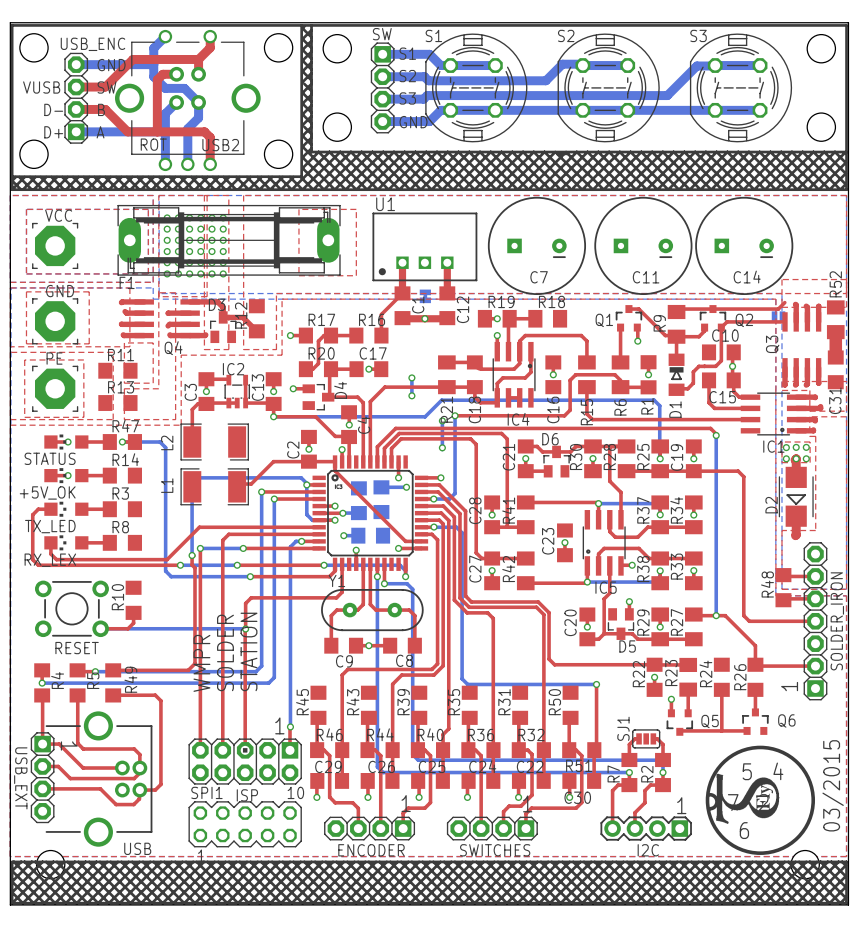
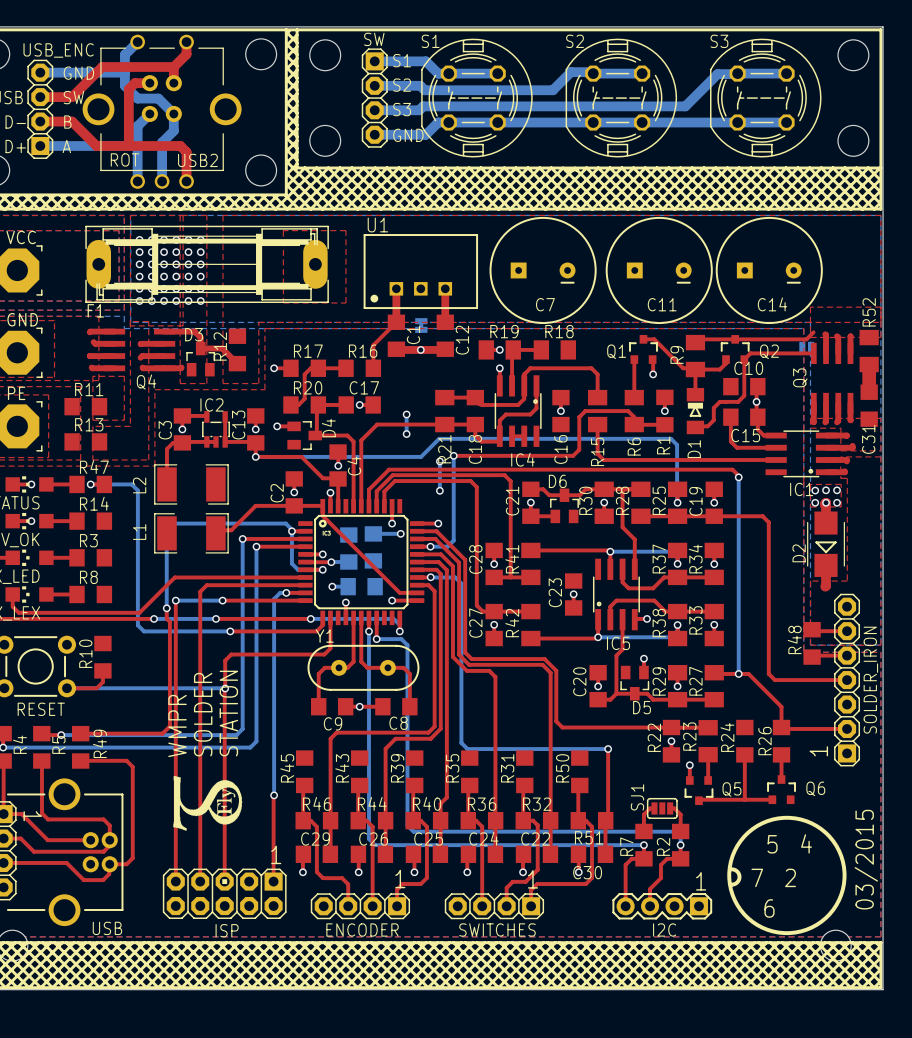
drawing: none -> [173, 776, 243, 831]
text position: 1 (279, 725) -> 1 (276, 854)
top track: none -> (175, 820) (175, 881)
top track: none -> (200, 820) (200, 881)
top track: none -> (224, 820) (224, 881)
top track: none -> (273, 820) (273, 881)
ISP position: (245, 761) -> (224, 893)
drawing: [716, 773, 780, 824] -> none
SPI1: (245, 824) -> none

